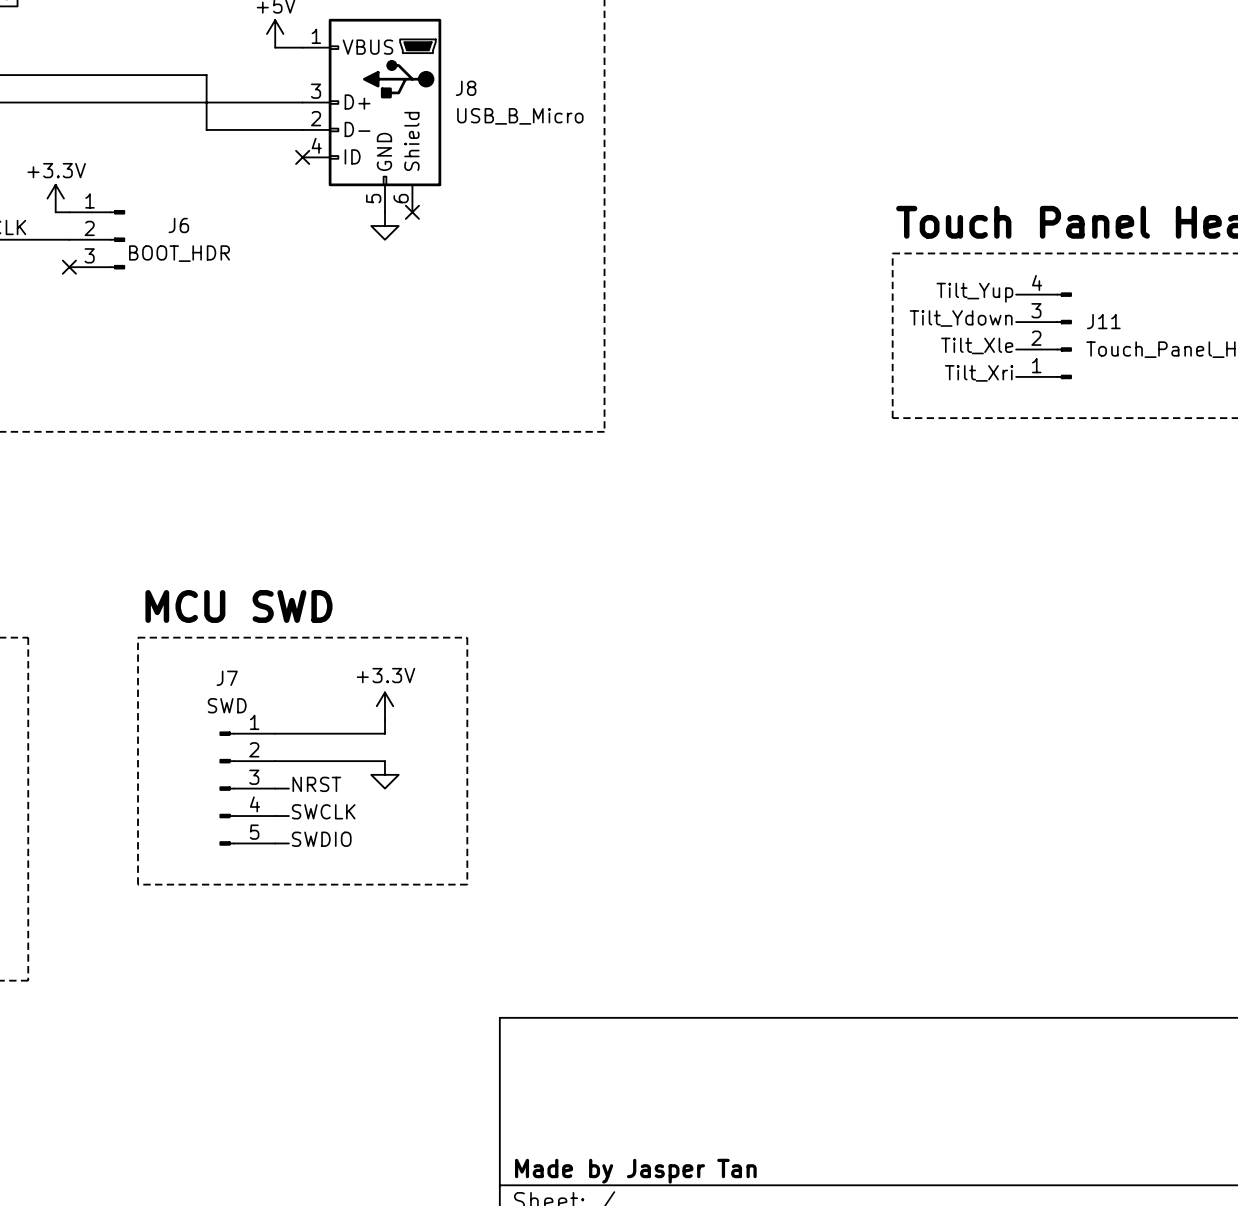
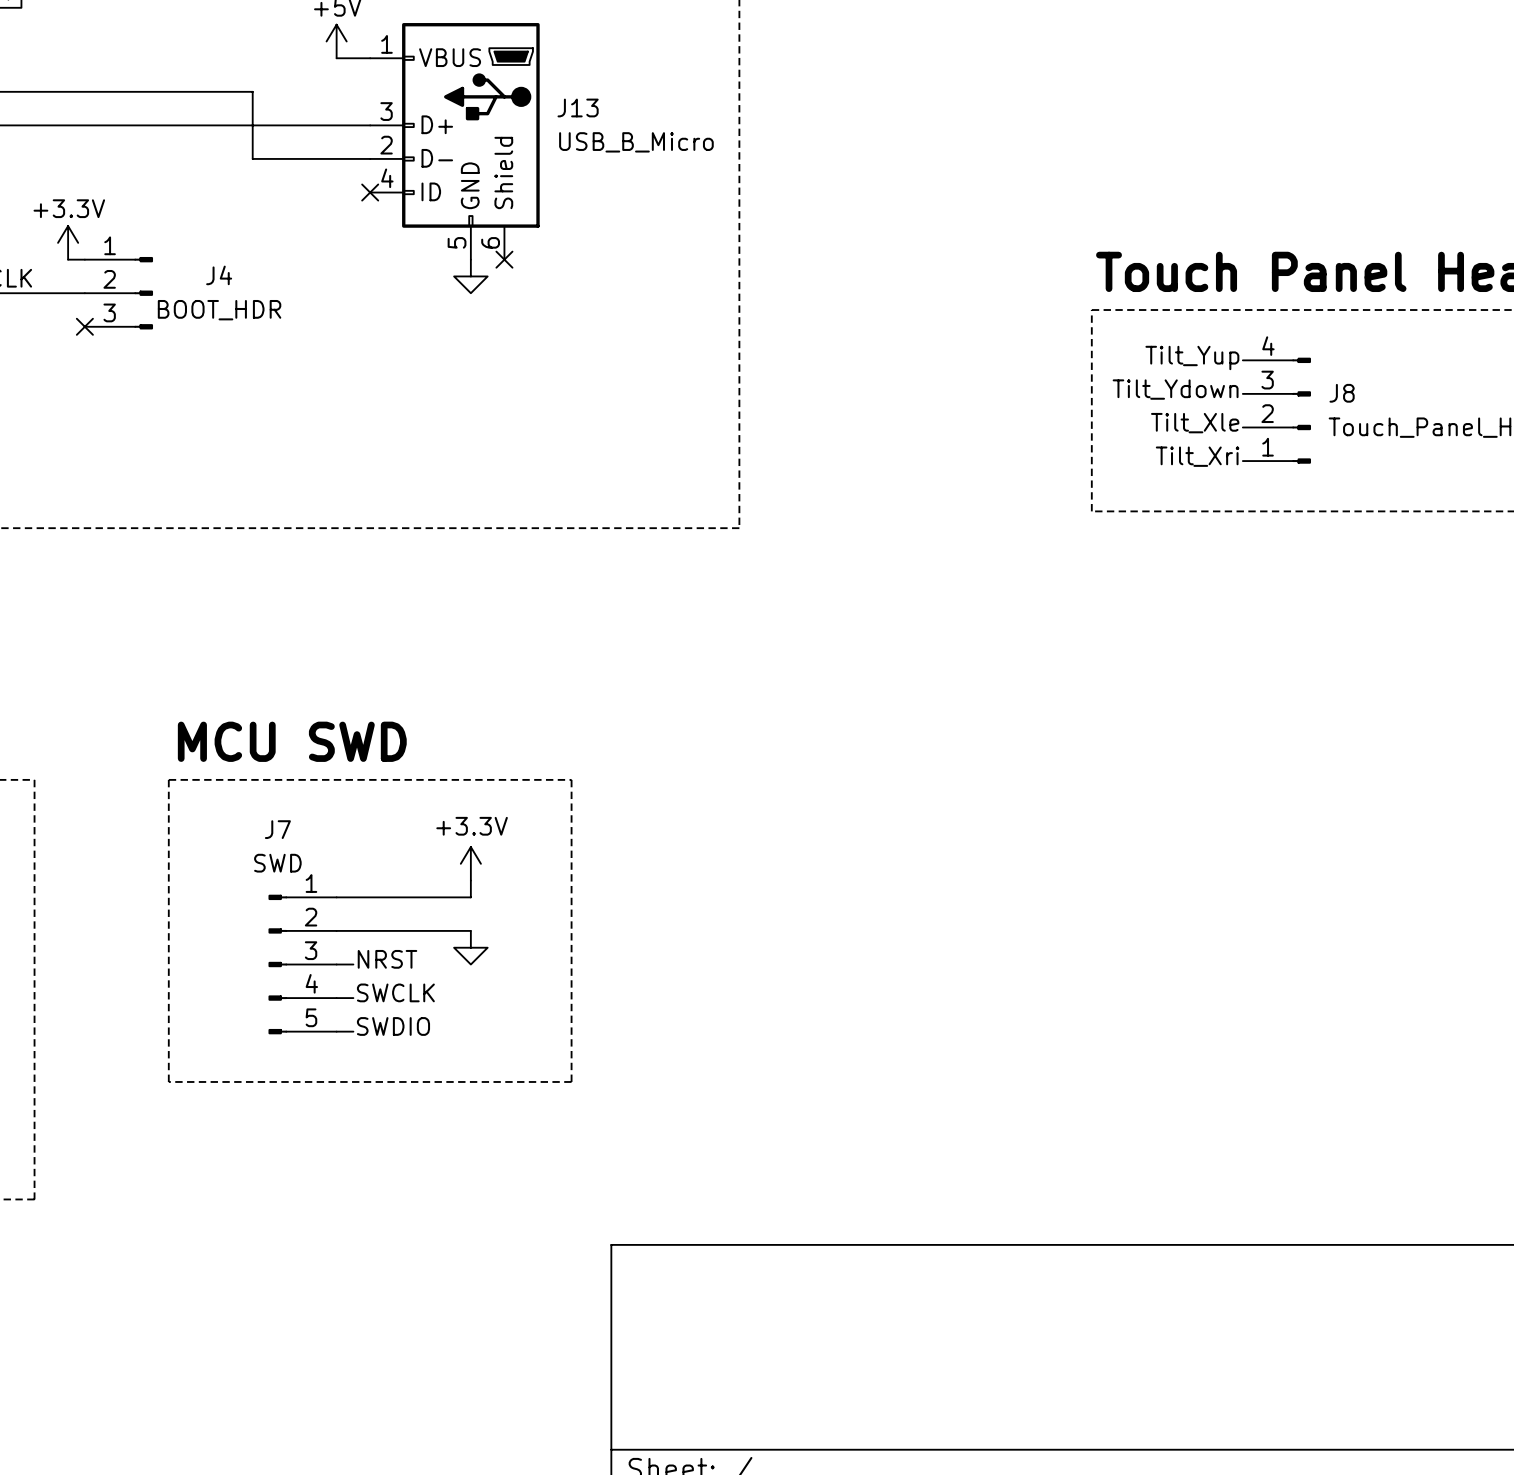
J8 name: J8 (466, 88) -> J13 (578, 107)
J6 name: J6 (178, 225) -> J4 (219, 275)
J11 name: J11 (1103, 321) -> J8 (1342, 393)
title block: Made by Jasper Tan (635, 1171) -> none

